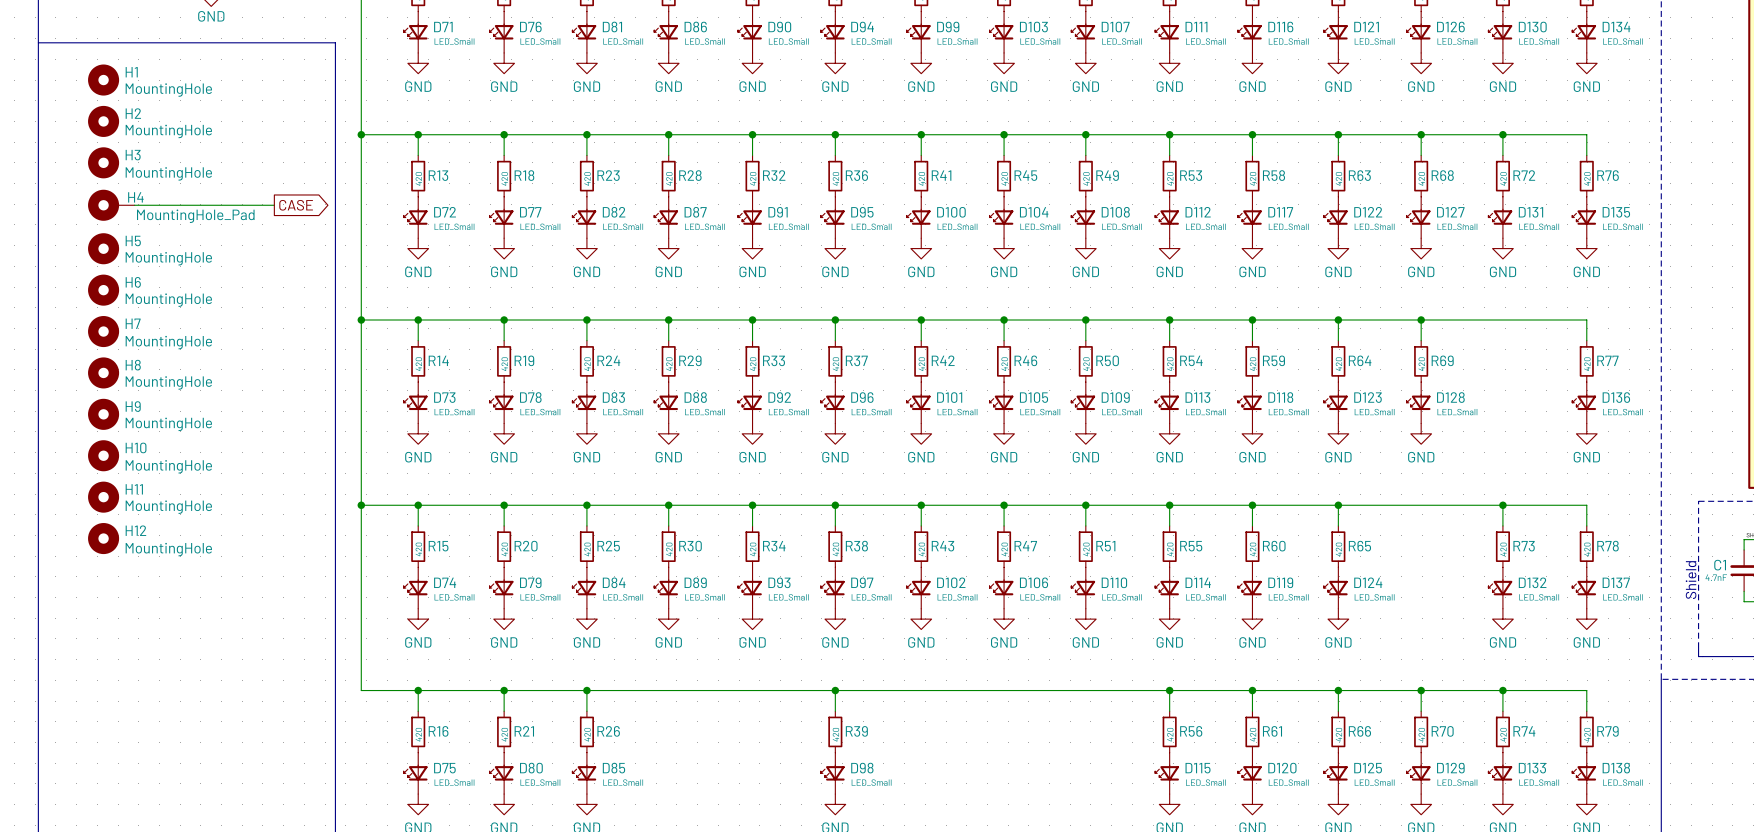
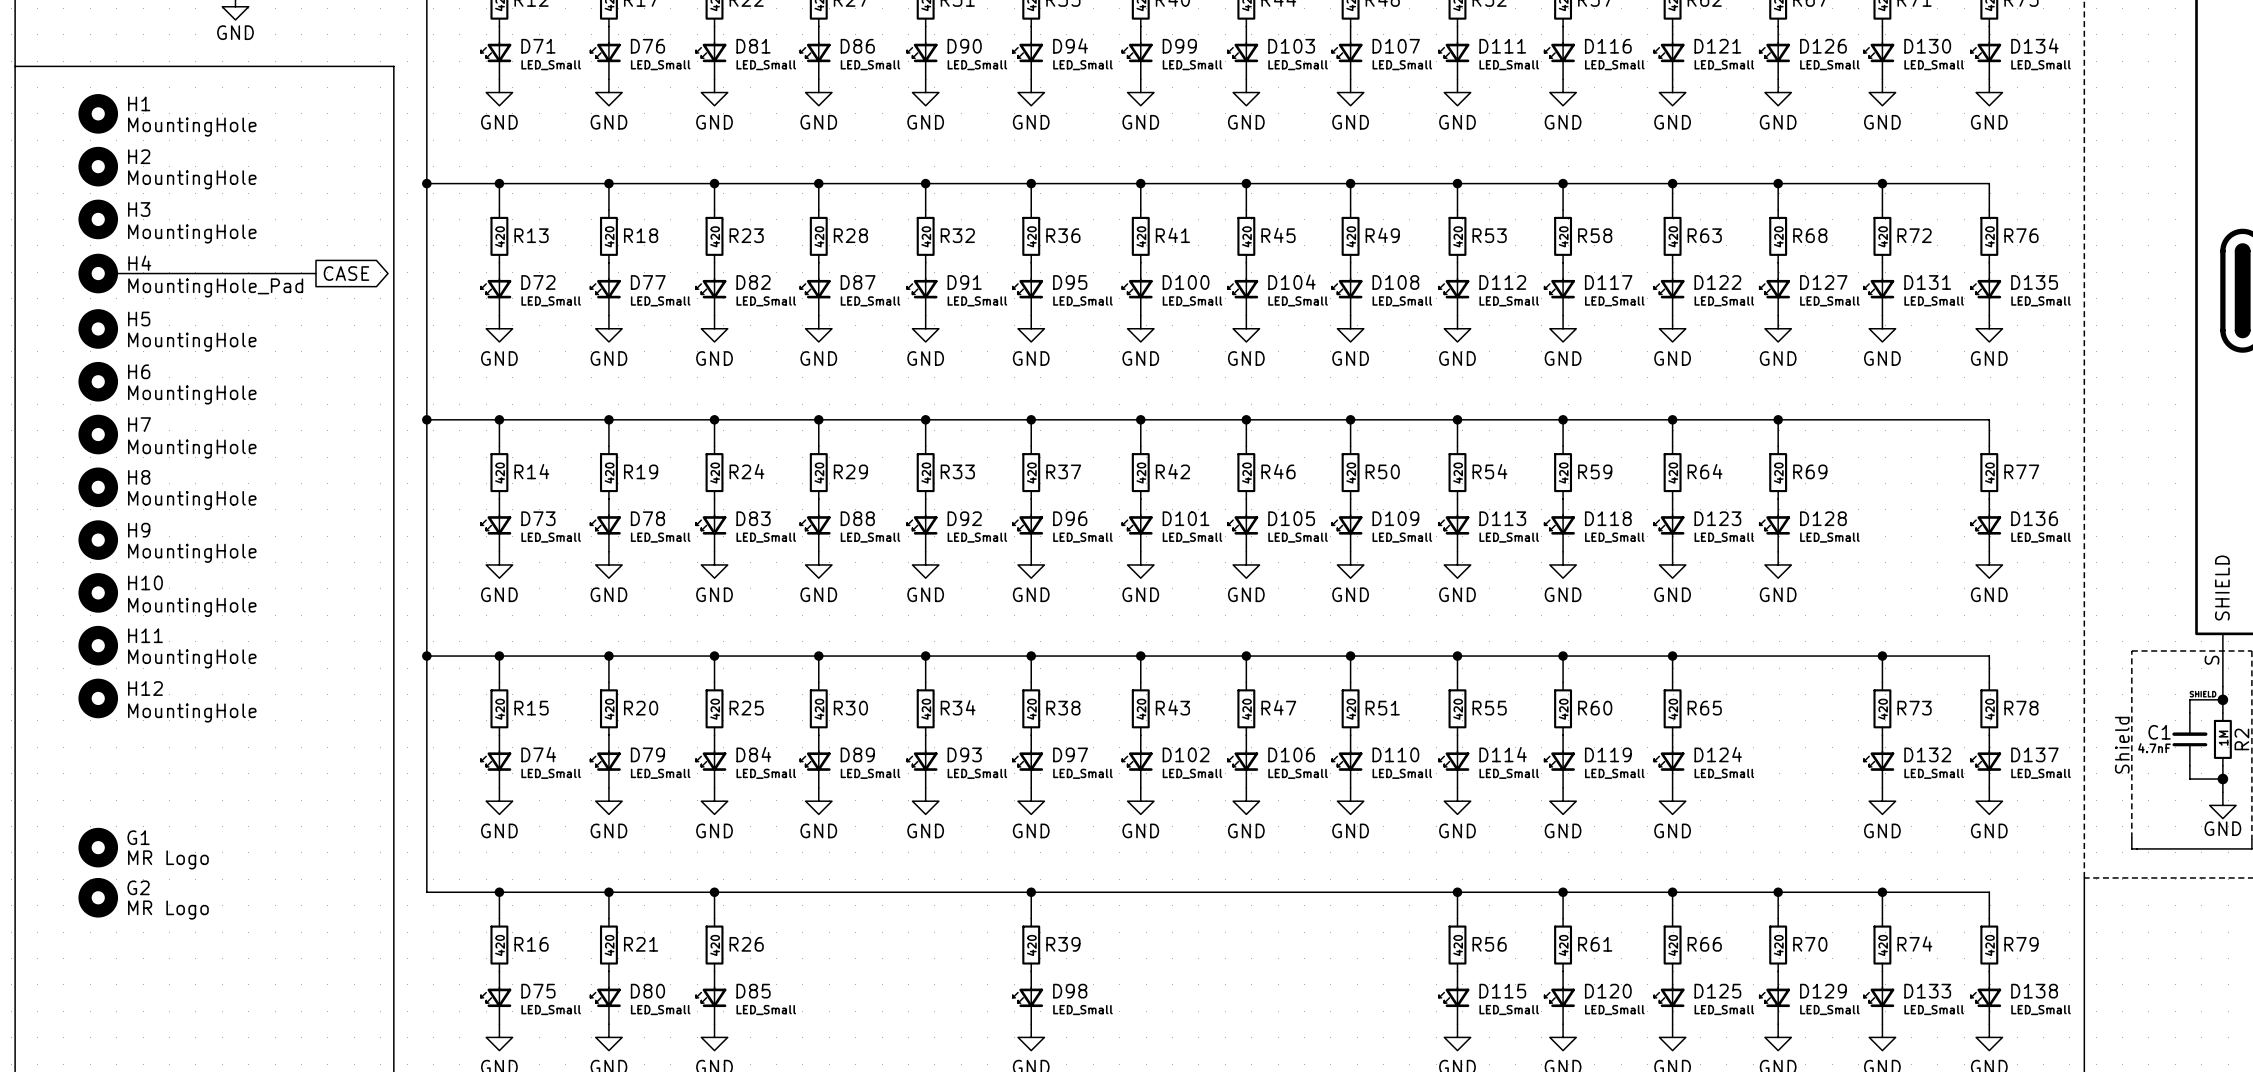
G1: none -> MR Logo (98, 847)
G2: none -> MR Logo (98, 897)

